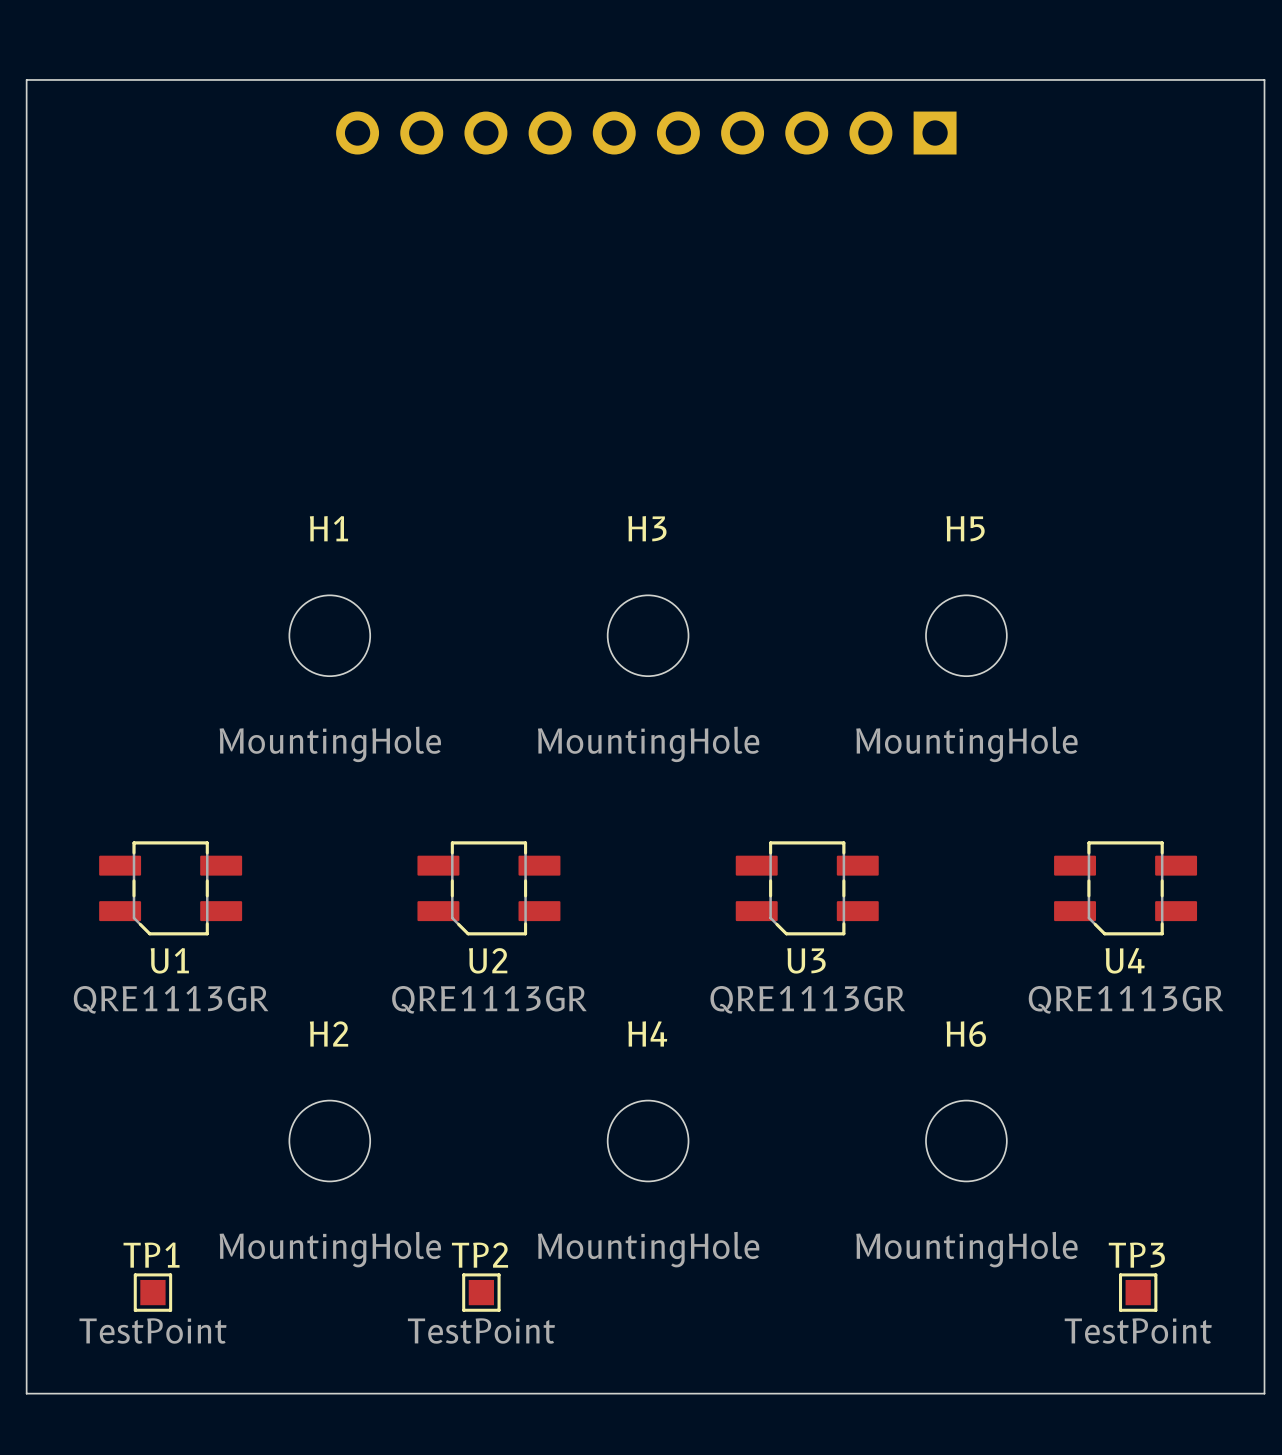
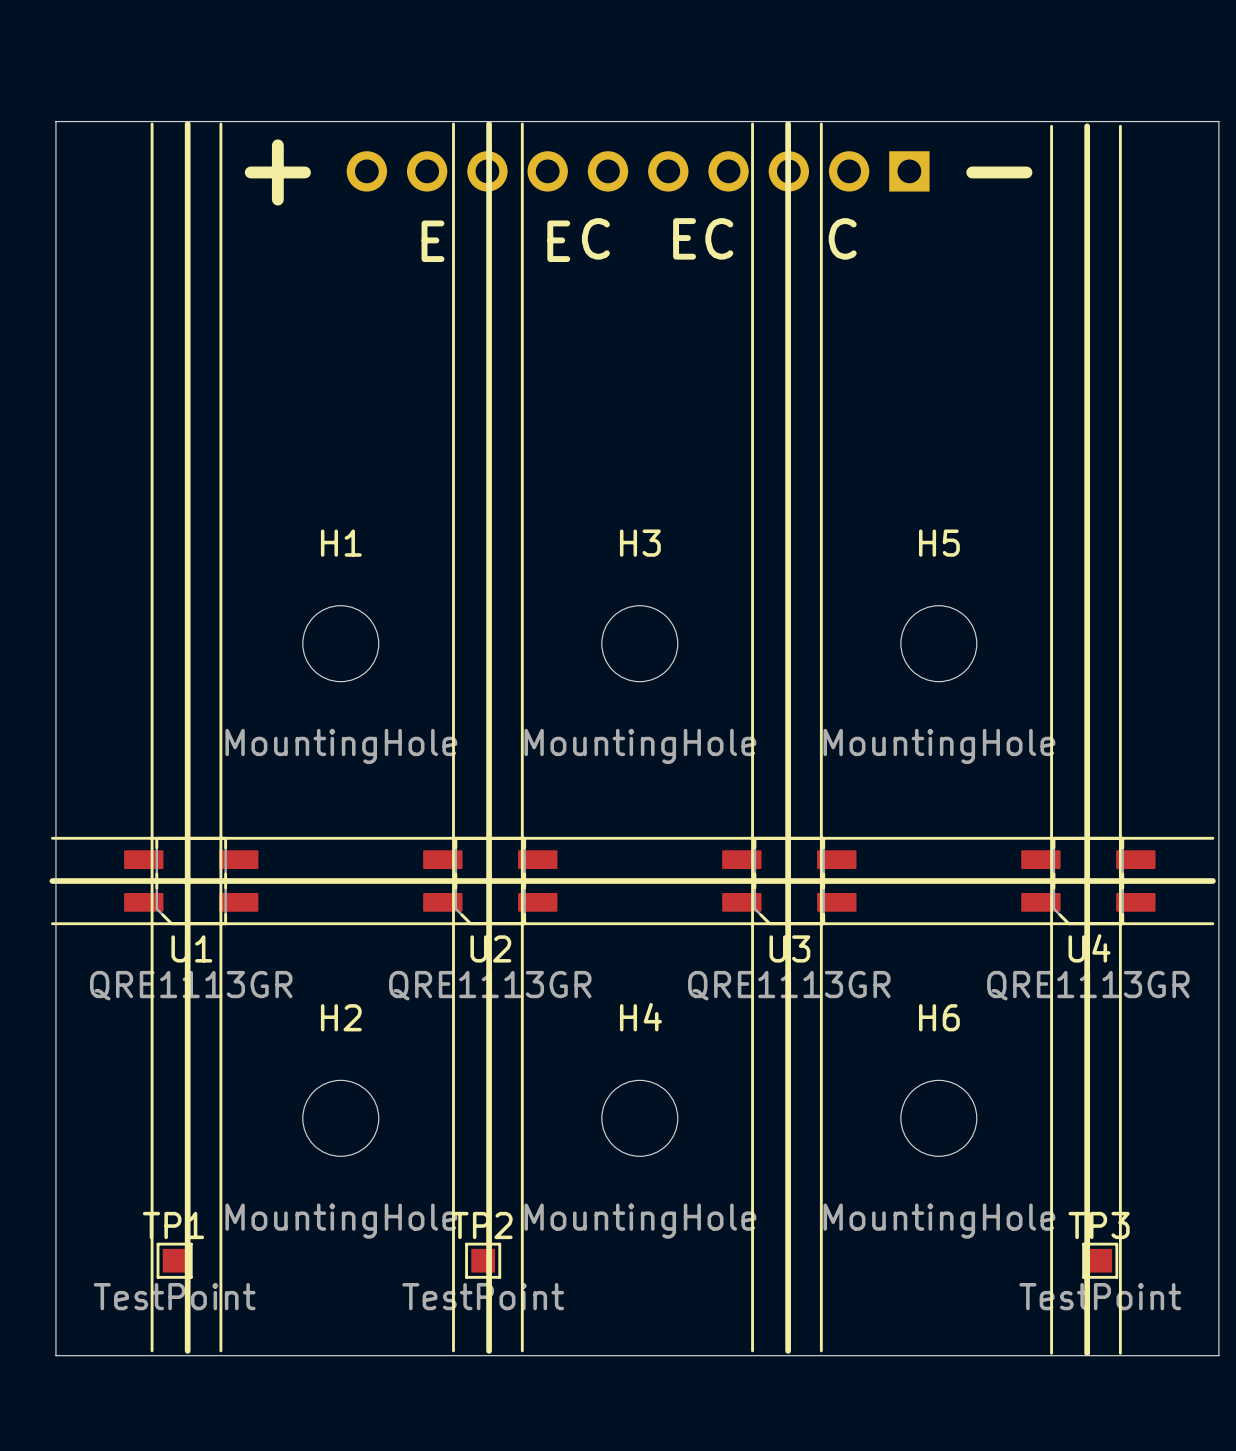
line: none -> (152, 123) (152, 1350)
line: none -> (187, 123) (187, 1350)
line: none -> (220, 123) (220, 1350)
line: none -> (453, 123) (453, 1350)
line: none -> (489, 123) (489, 1350)
line: none -> (522, 123) (522, 1350)
line: none -> (752, 123) (752, 1350)
line: none -> (788, 123) (788, 1350)
line: none -> (821, 123) (821, 1350)
line: none -> (1051, 126) (1051, 1353)
line: none -> (1087, 126) (1087, 1353)
line: none -> (1120, 126) (1120, 1353)
text: none -> + (277, 172)
text: none -> - (999, 172)
text: none -> C (595, 238)
text: none -> E (684, 238)
text: none -> C (719, 238)
text: none -> C (842, 238)
text: none -> E (432, 241)
text: none -> E (558, 241)
line: none -> (52, 838) (1212, 838)
line: none -> (52, 881) (1212, 881)
line: none -> (52, 923) (1212, 923)

